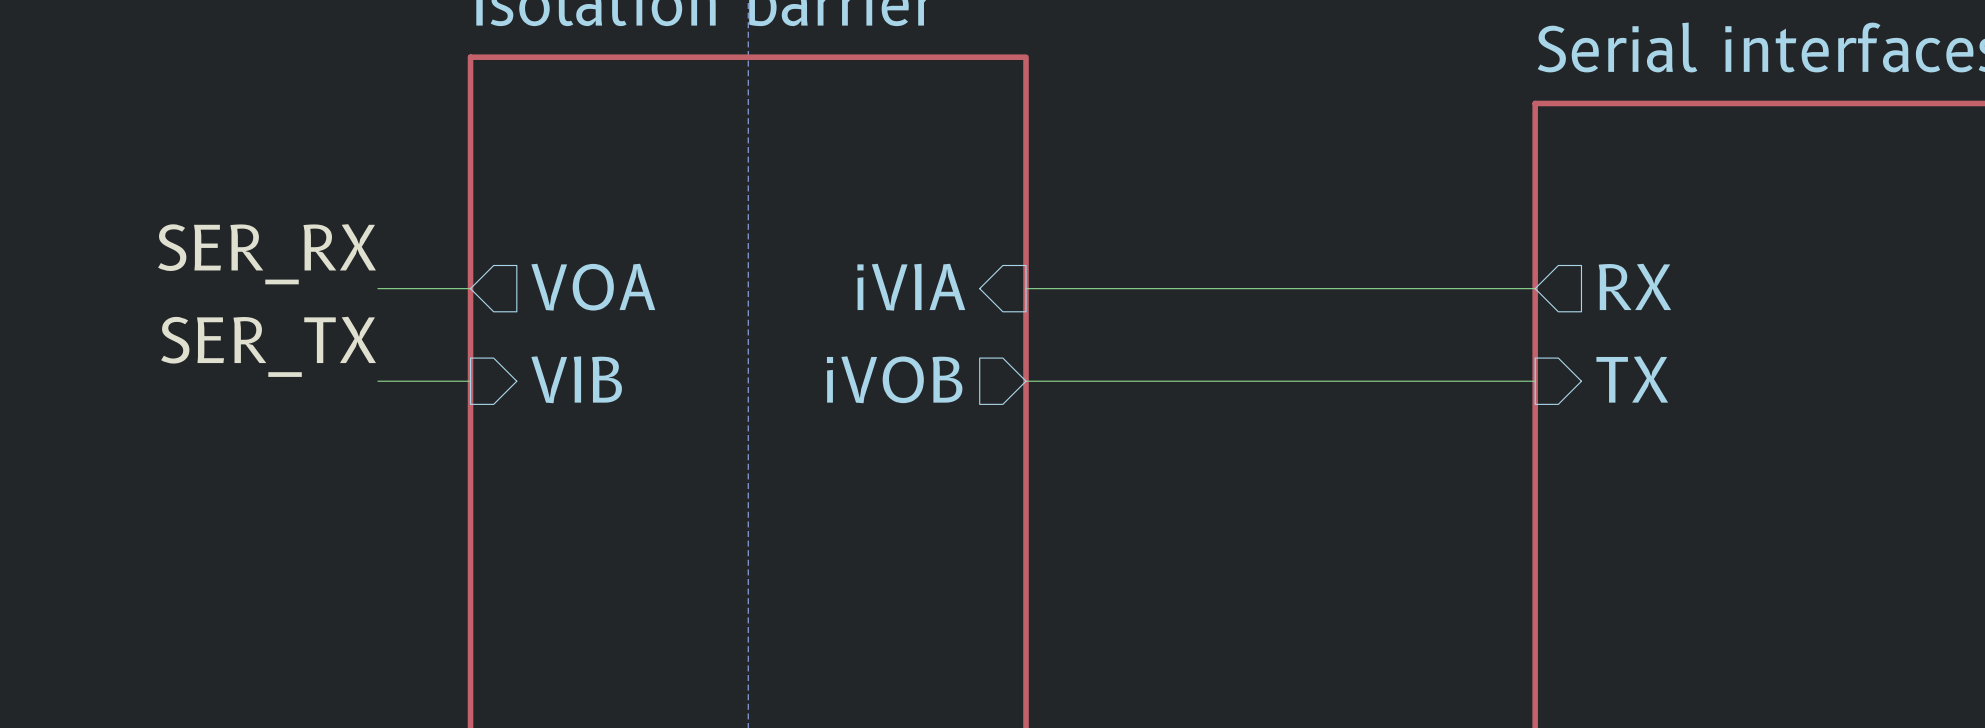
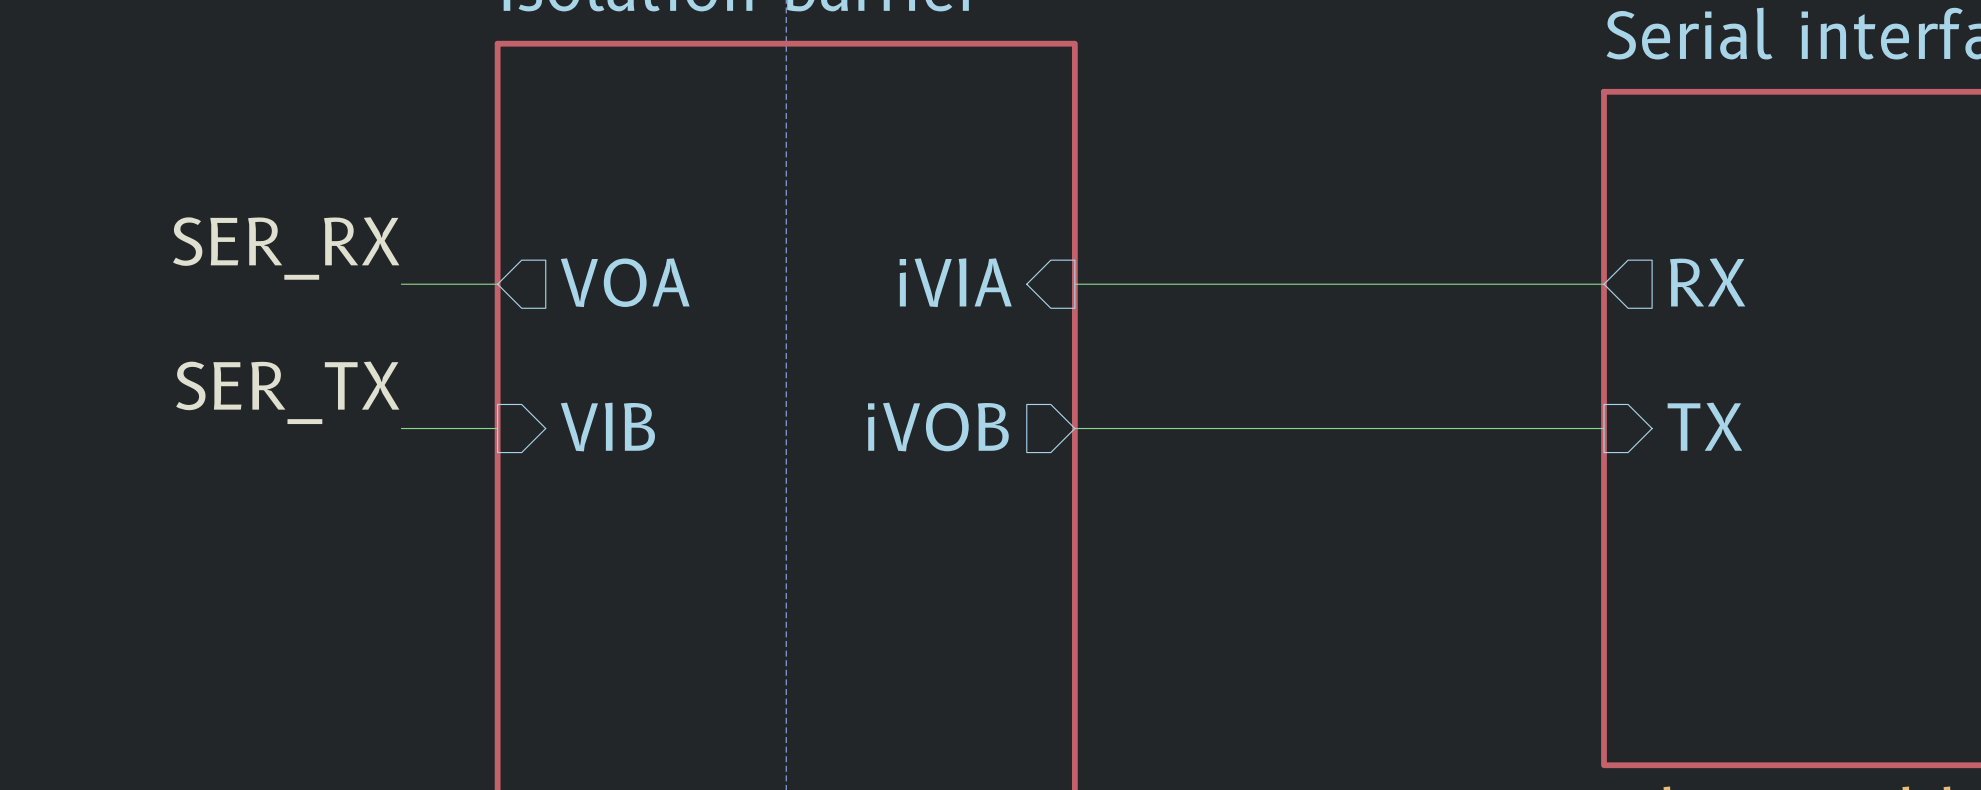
label position: SER_TX (268, 346) -> SER_TX (287, 392)
sheet pin position: VIB (576, 379) -> VIB (607, 427)
sheet pin position: iVOB (894, 379) -> iVOB (938, 427)
sheet pin position: TX (1632, 379) -> TX (1704, 426)
wire: (377, 381) (470, 381) -> (401, 428) (497, 428)
wire: (1026, 381) (1535, 381) -> (1074, 428) (1604, 428)

